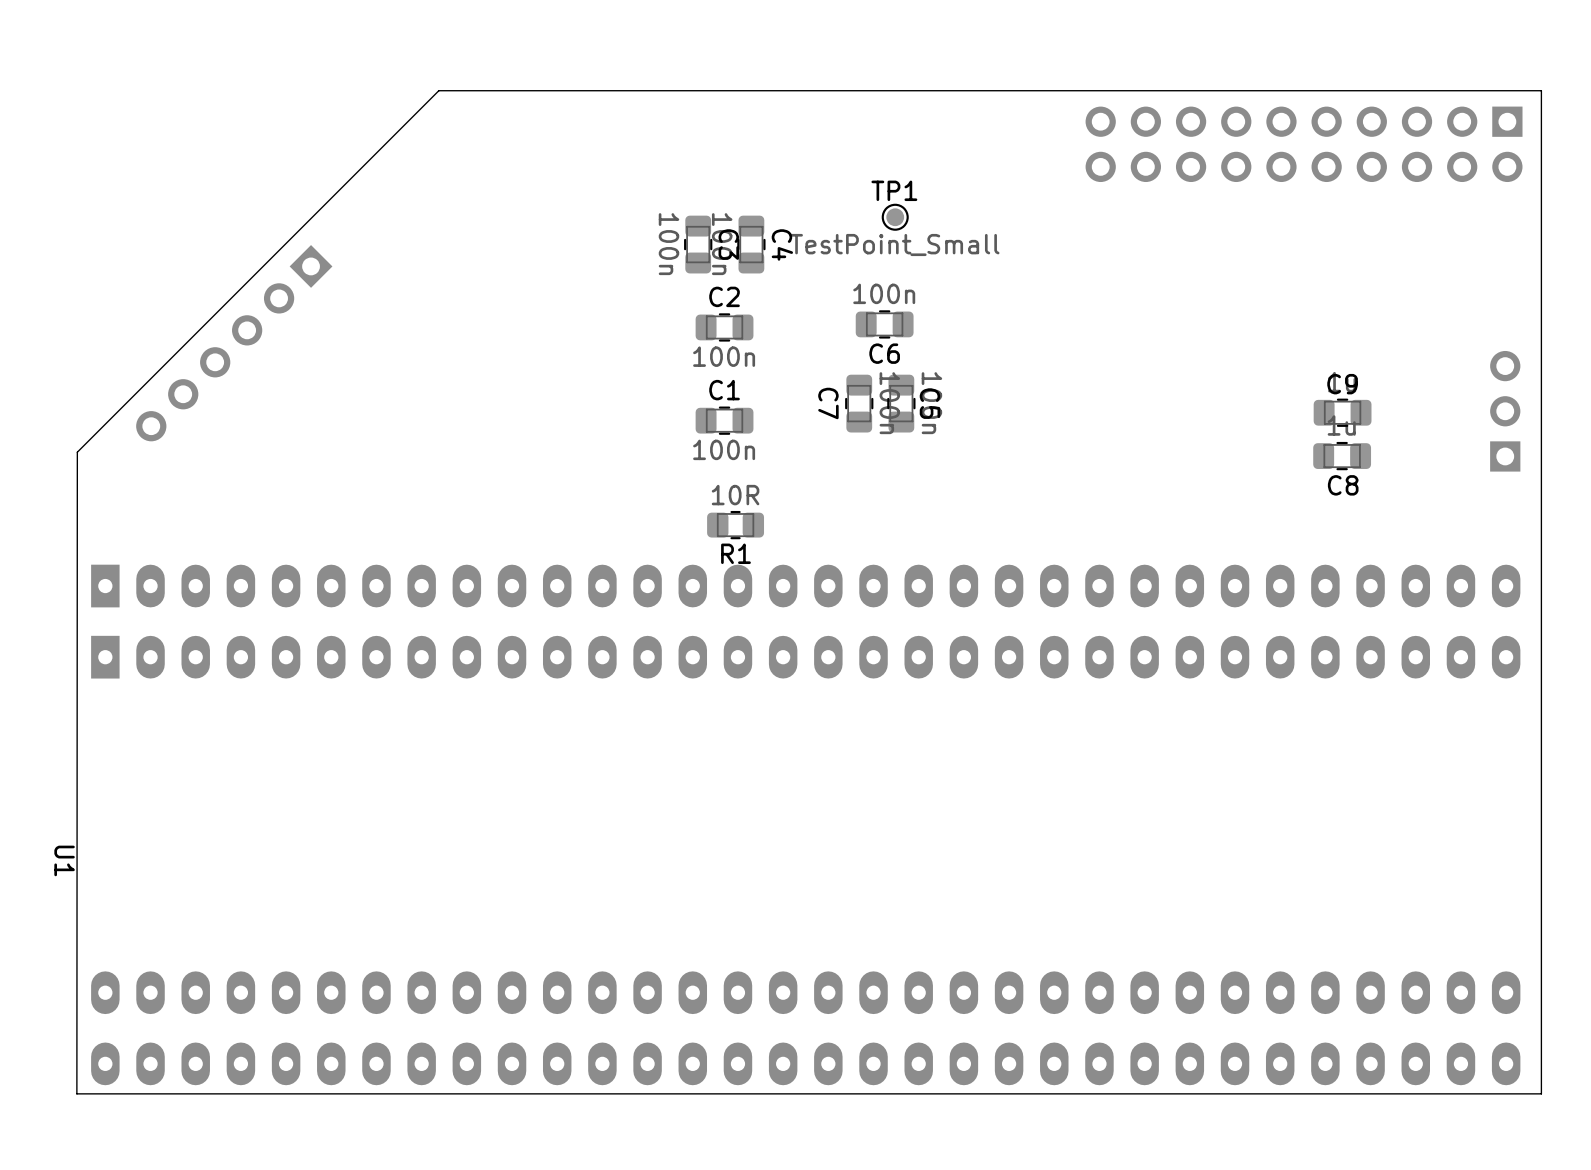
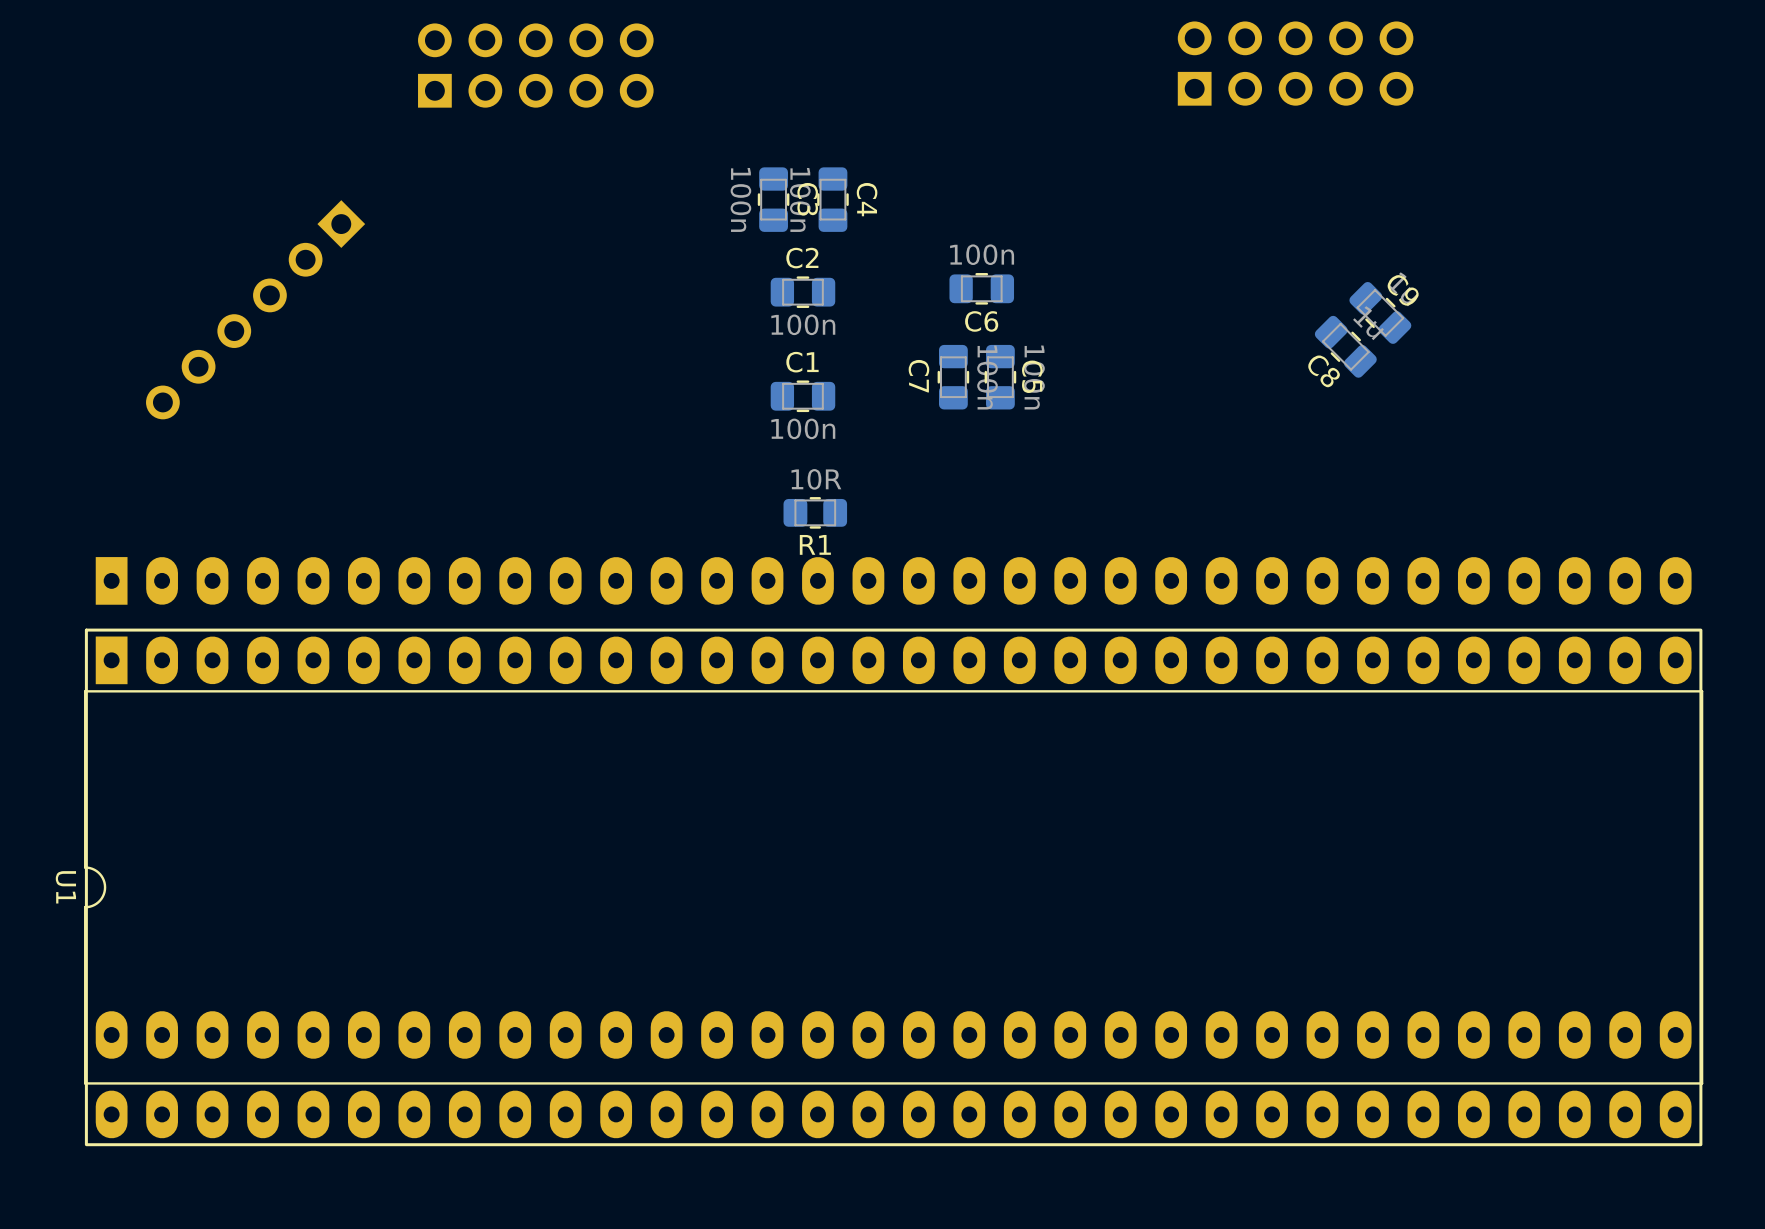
board edge: (1541, 90) (1541, 1093) (76, 1093) (77, 452) (438, 90) (1541, 90) -> none
part: none -> (1295, 63)
part: none -> (535, 65)
part: (1304, 144) -> none
TP1: TestPoint_Small (895, 217) -> none
part: (1505, 411) -> none
C9 rotation: 0° (1342, 412) -> 45° clockwise (1380, 312)
C9 position: (1342, 412) -> (1380, 312)
C8 rotation: 0° (1342, 456) -> 45° clockwise (1345, 346)
C8 position: (1342, 456) -> (1345, 346)
U1 footprint: [91, 635, 1521, 1086] -> [84, 628, 1704, 1147]

